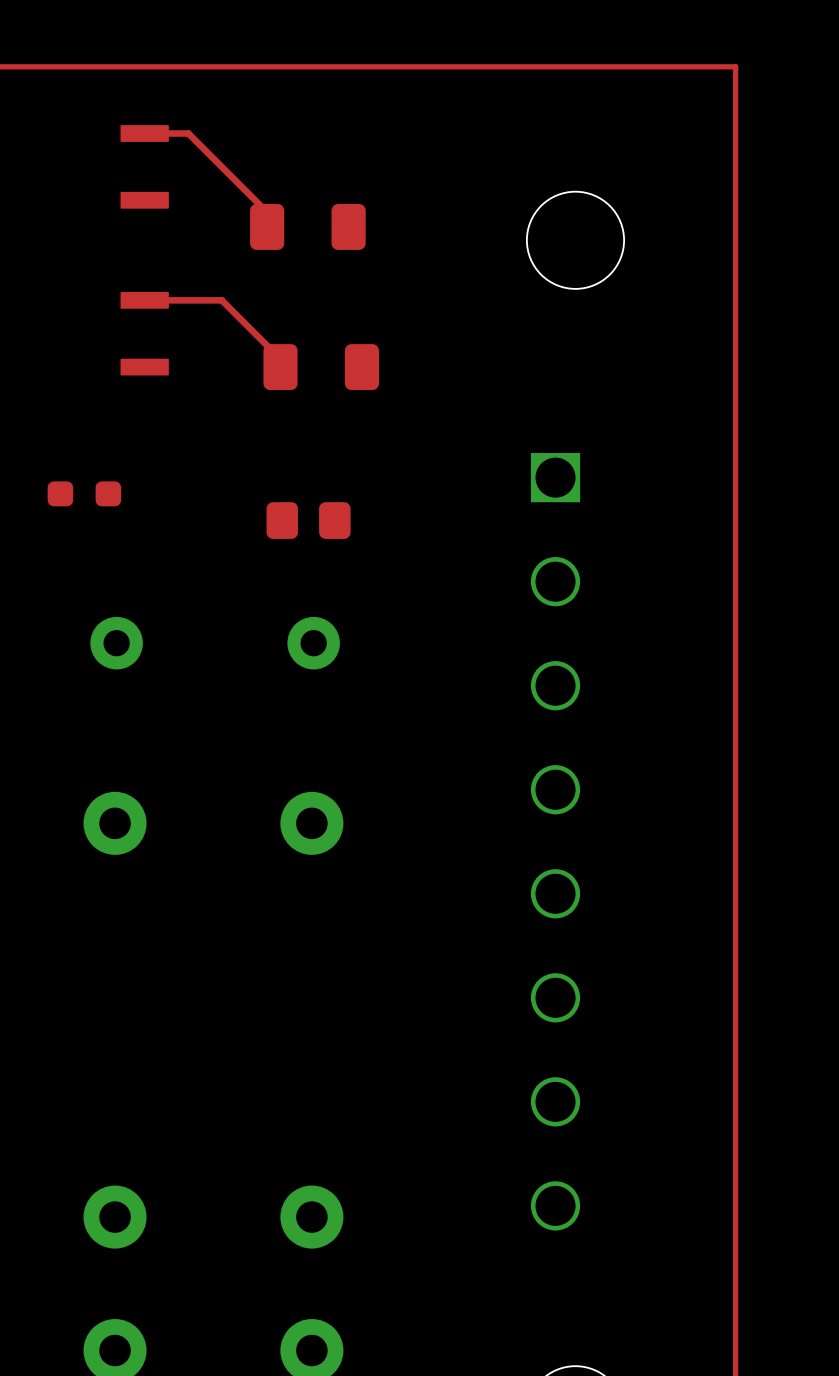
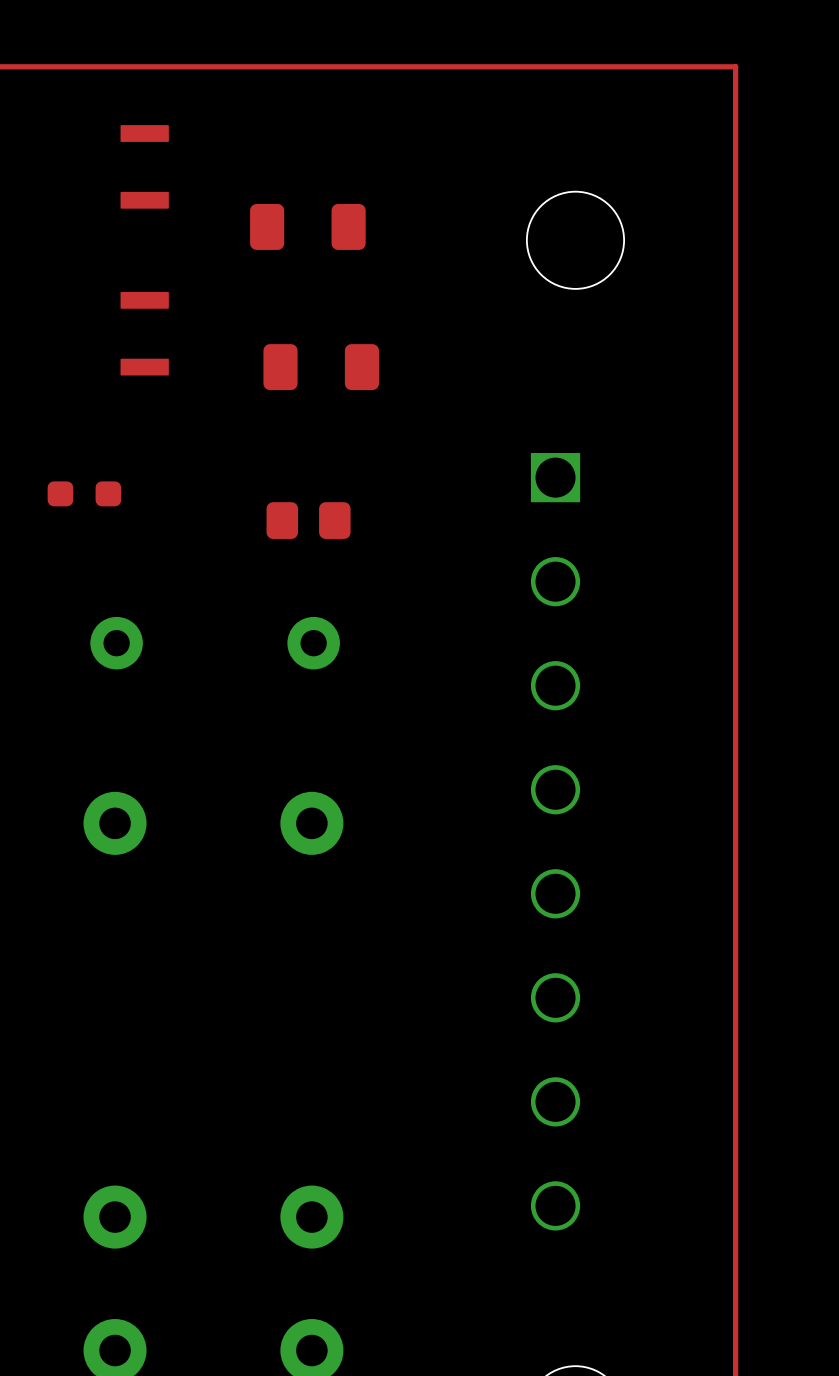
top track: (144, 133) (188, 133) (267, 212) (267, 226) -> none
top track: (144, 300) (221, 300) (280, 359) (280, 367) -> none

